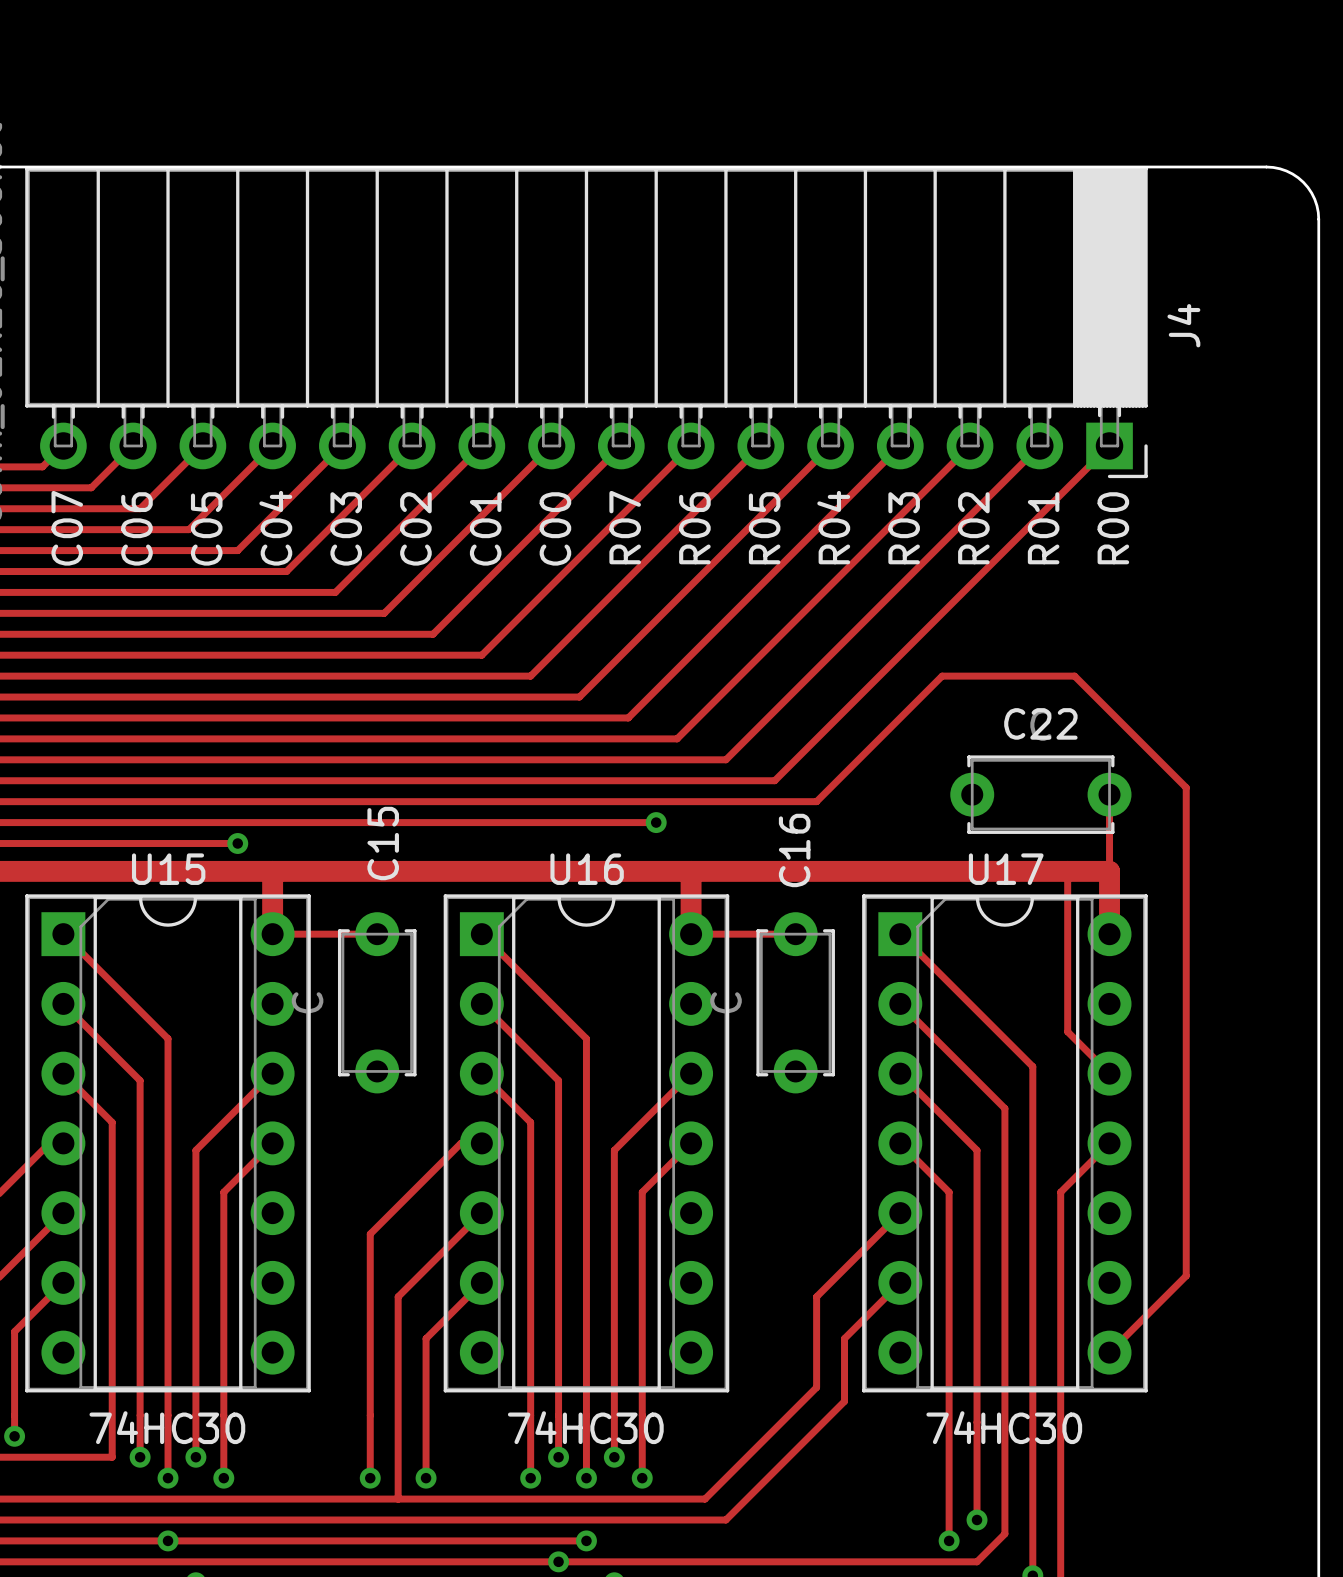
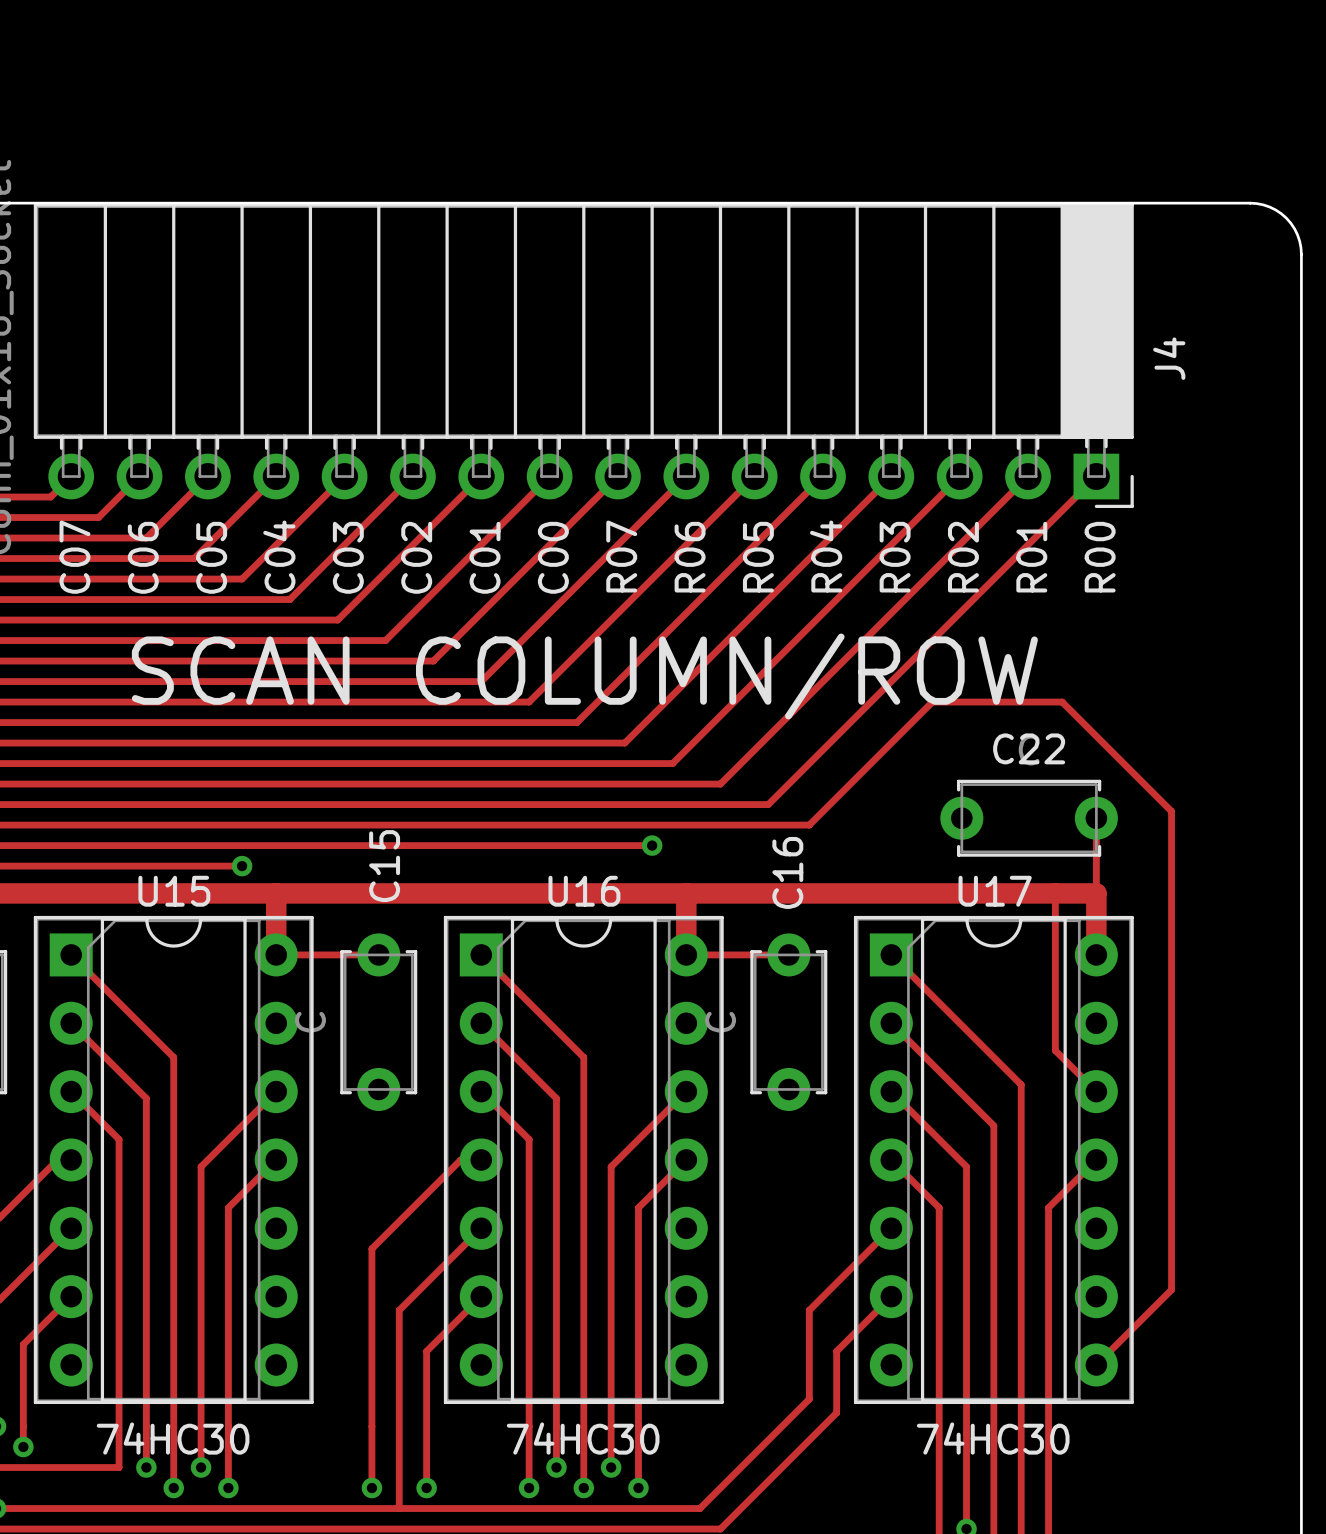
text: none -> SCAN COLUMN/ROW (584, 676)

